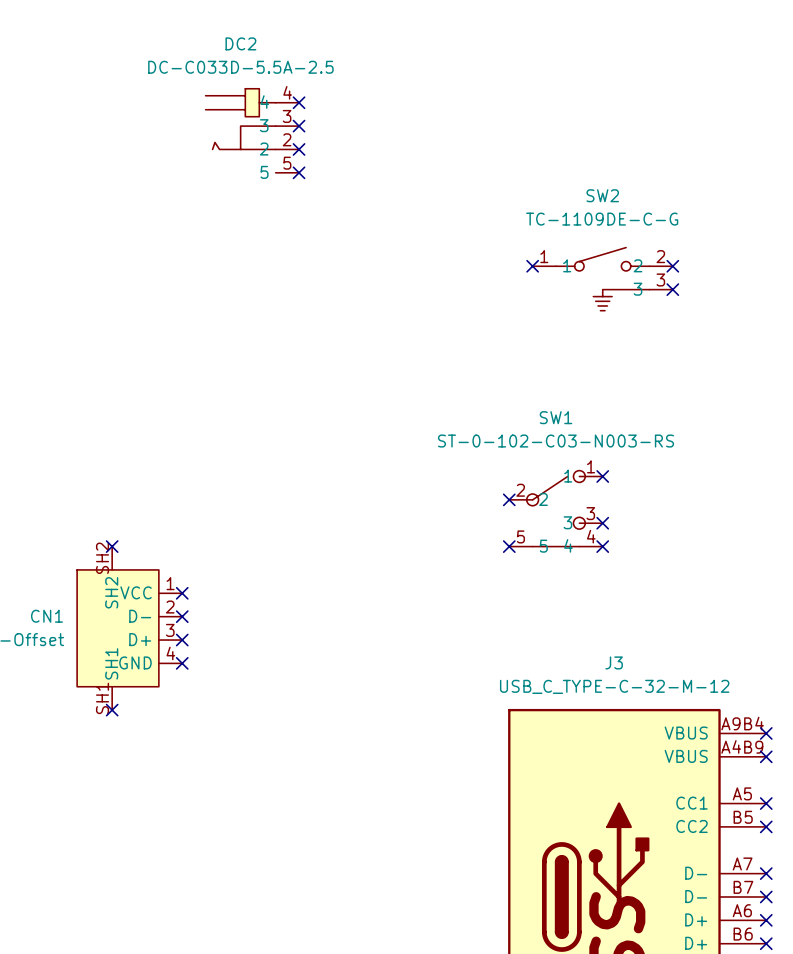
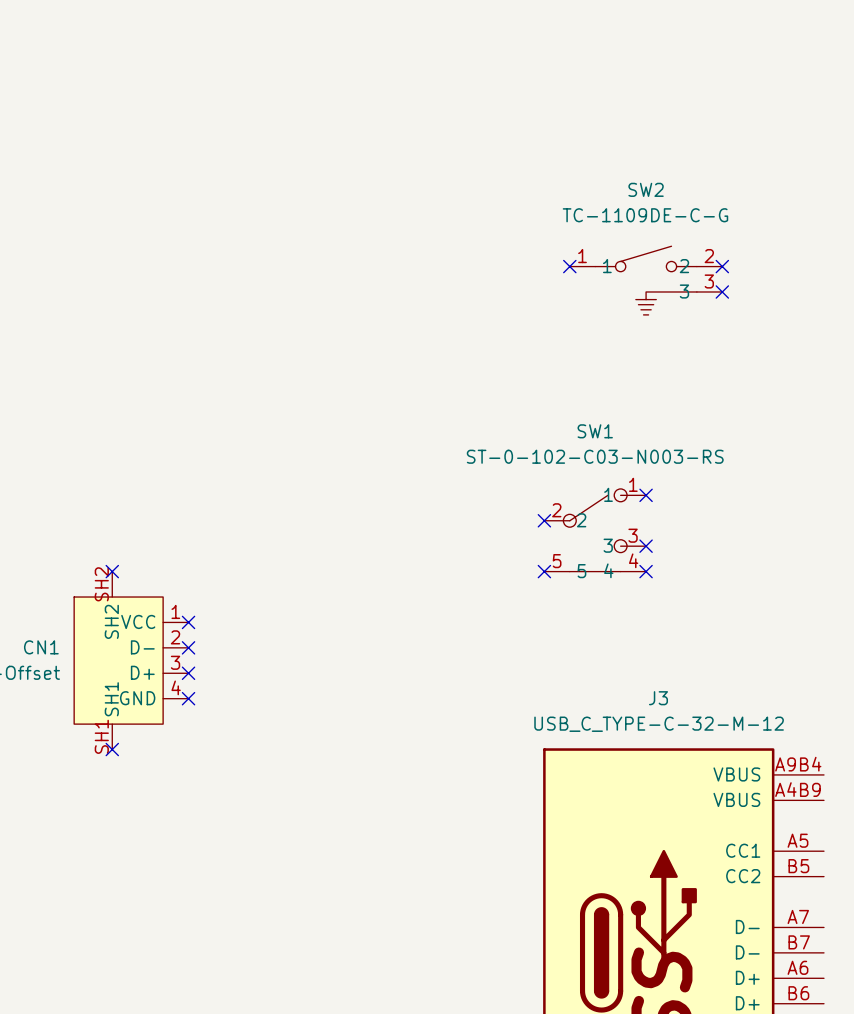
no-connect mark: (299, 102) -> none
no-connect mark: (299, 126) -> none
DC2: DC-C033D-5.5A-2.5 (252, 130) -> none
no-connect mark: (299, 149) -> none
no-connect mark: (299, 172) -> none
no-connect mark: (766, 733) -> none
no-connect mark: (766, 756) -> none
no-connect mark: (766, 803) -> none
no-connect mark: (766, 826) -> none
no-connect mark: (766, 873) -> none
no-connect mark: (766, 896) -> none
no-connect mark: (766, 920) -> none
no-connect mark: (766, 943) -> none

